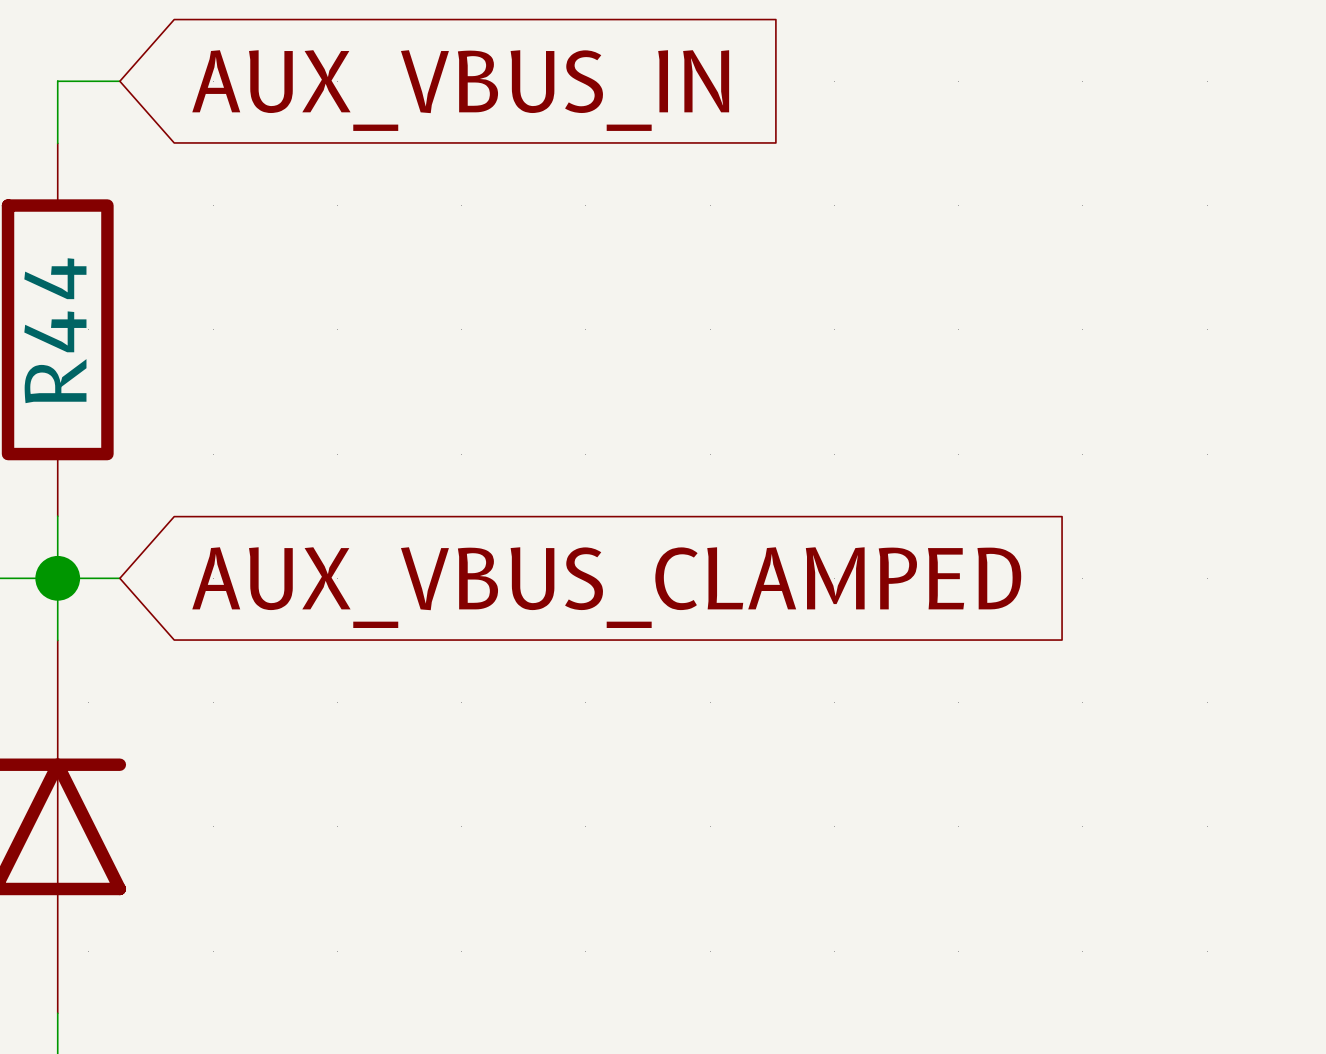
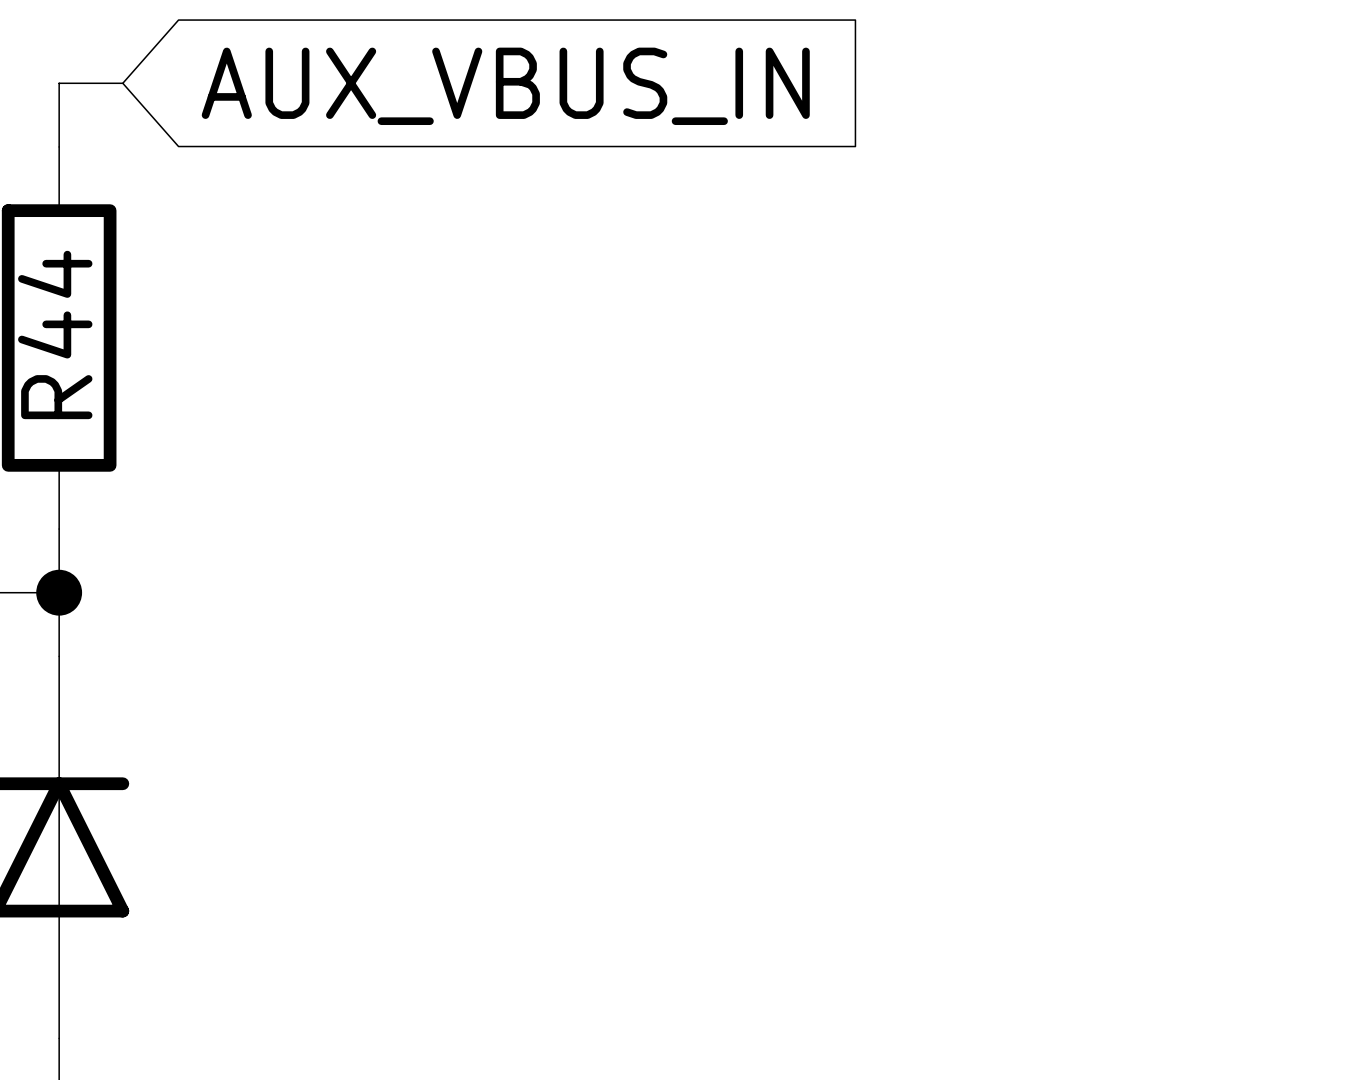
wire: (57, 578) (119, 578) -> none
global label: AUX_VBUS_CLAMPED (606, 587) -> none

